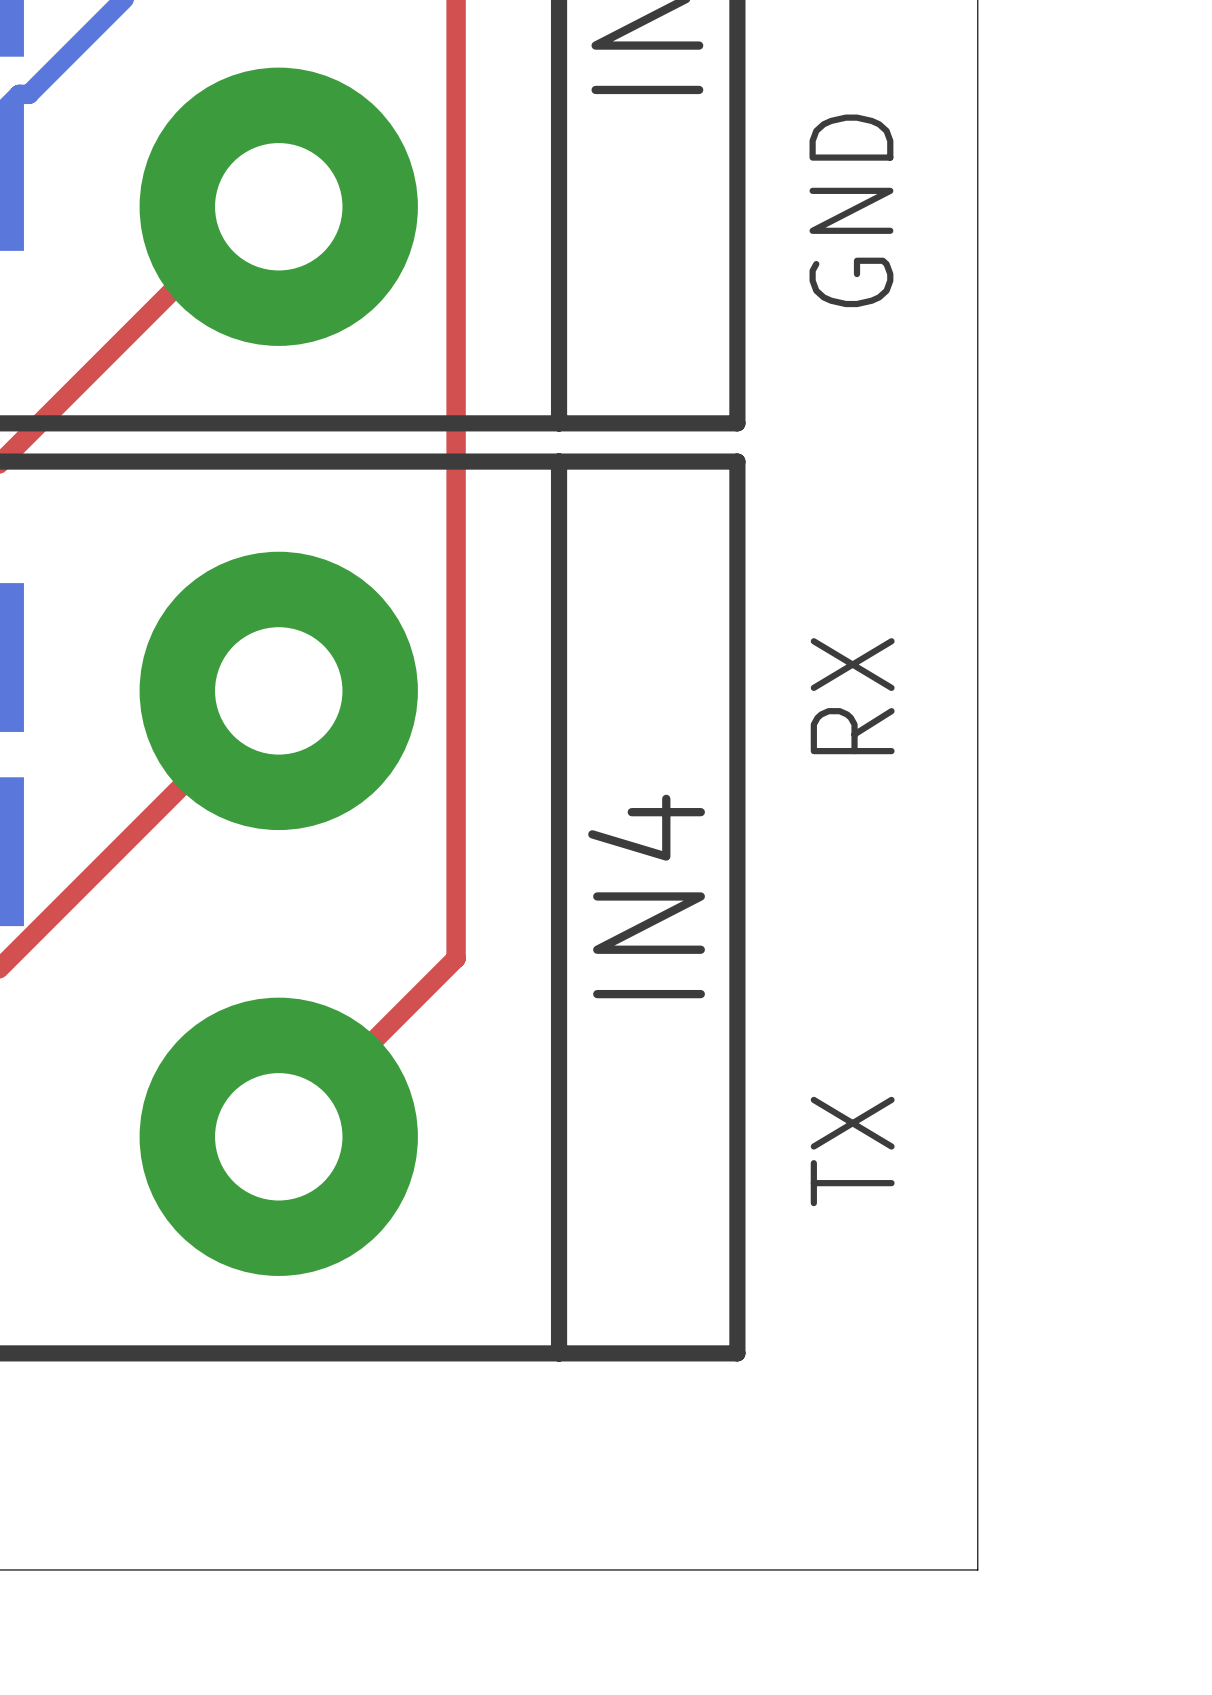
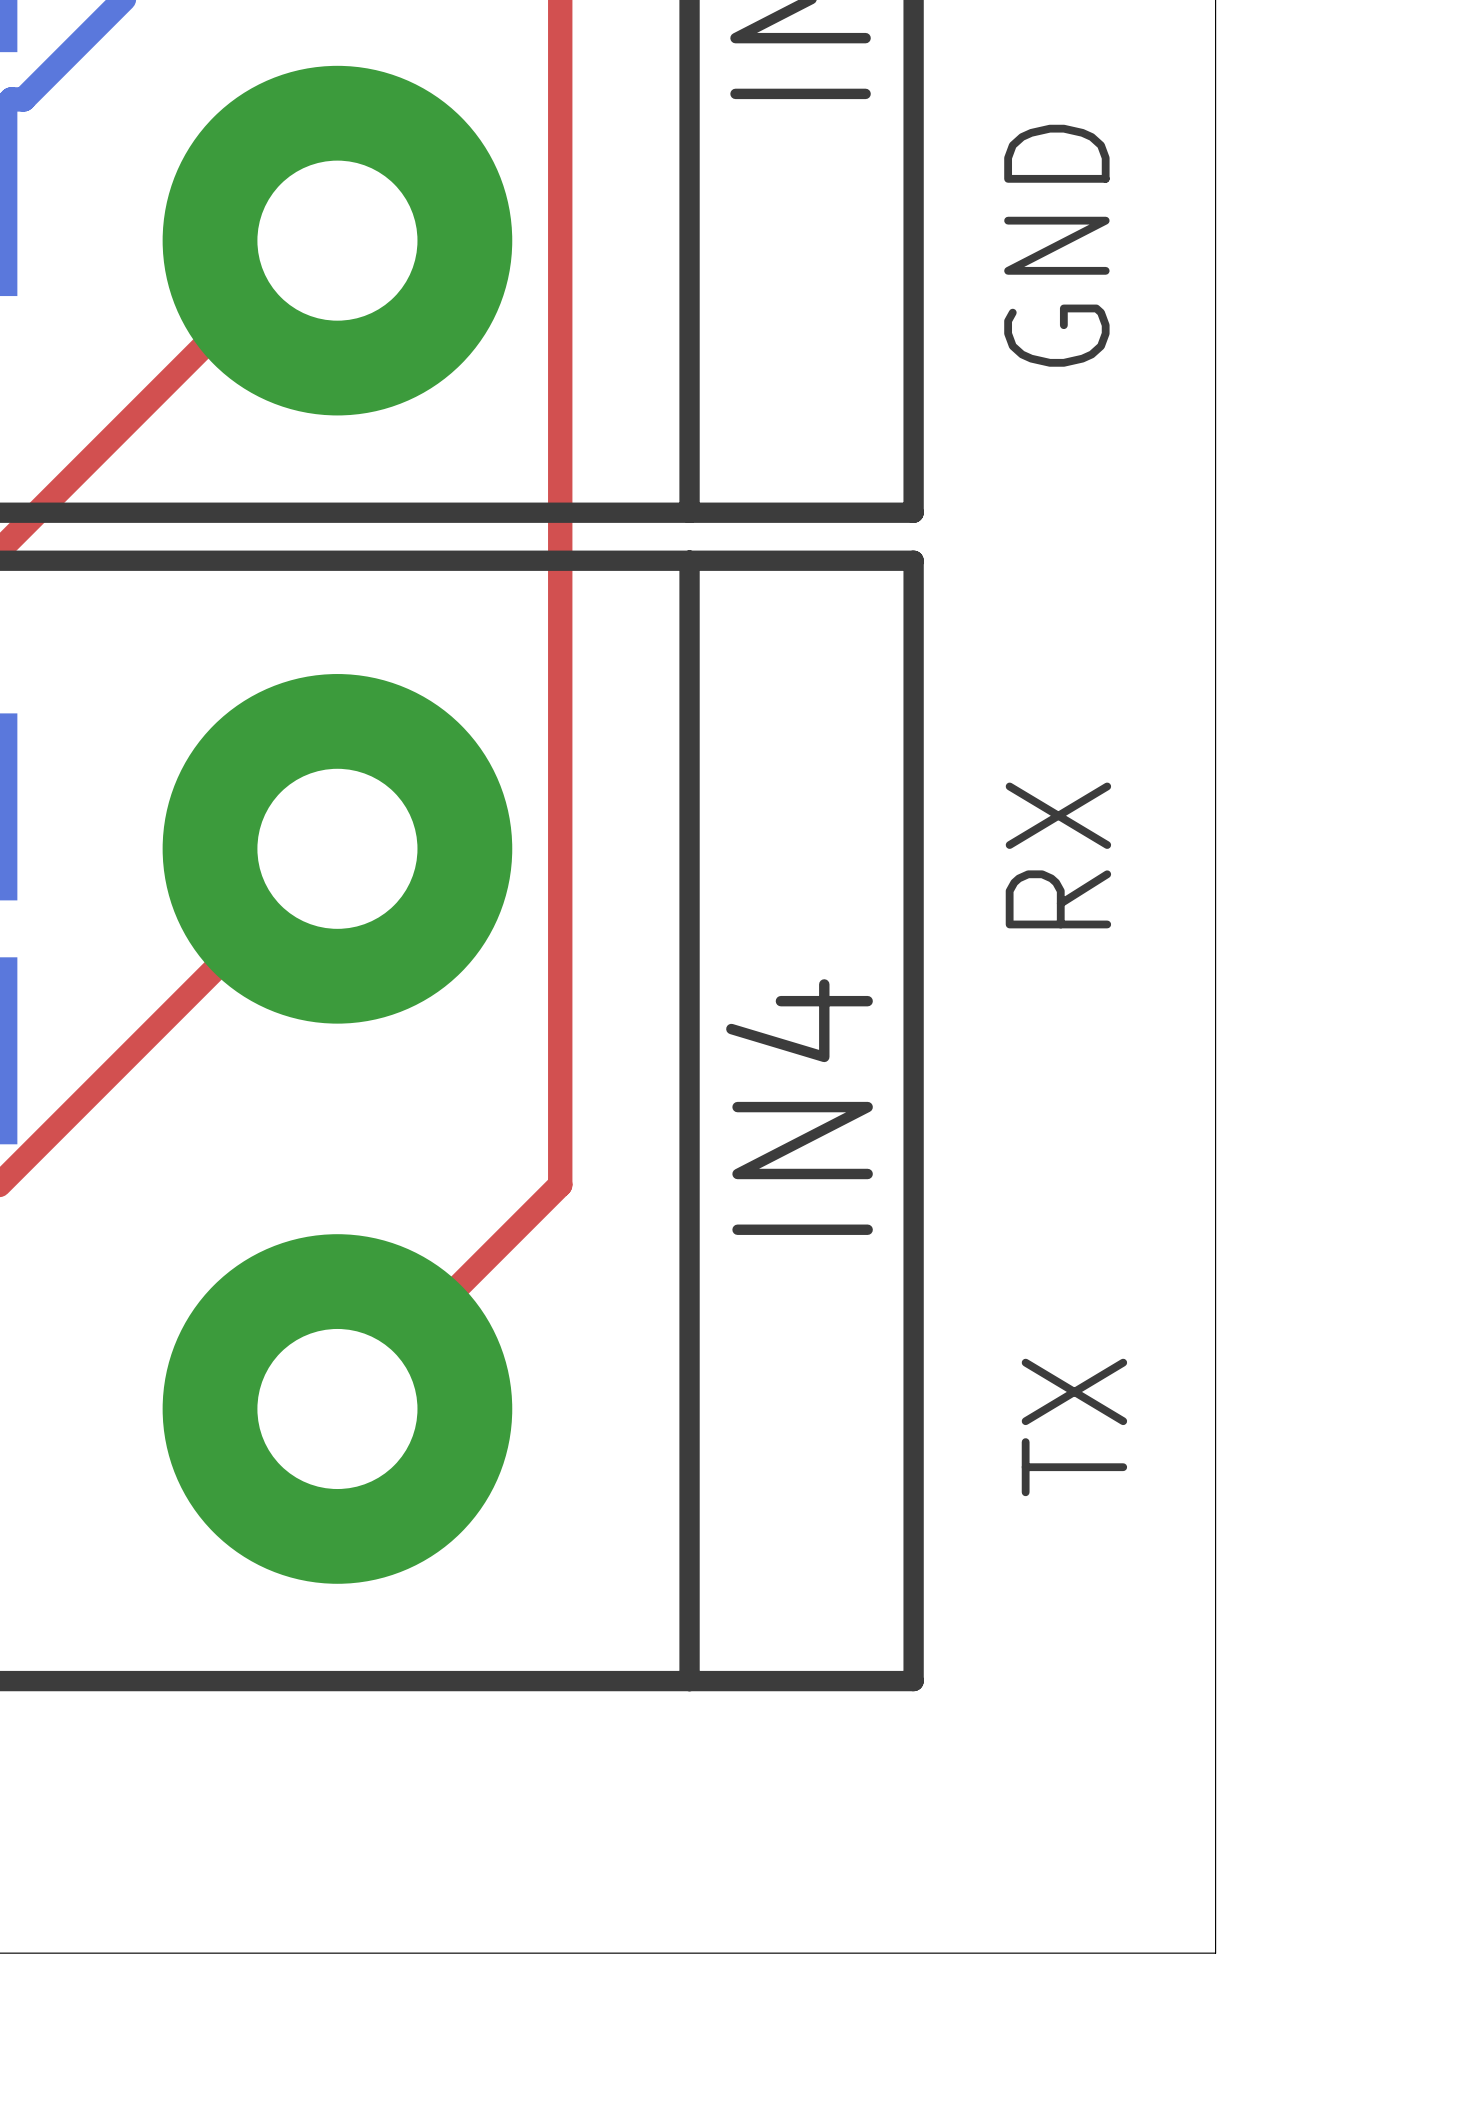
text position: TX (852, 1151) -> TX (1074, 1427)

